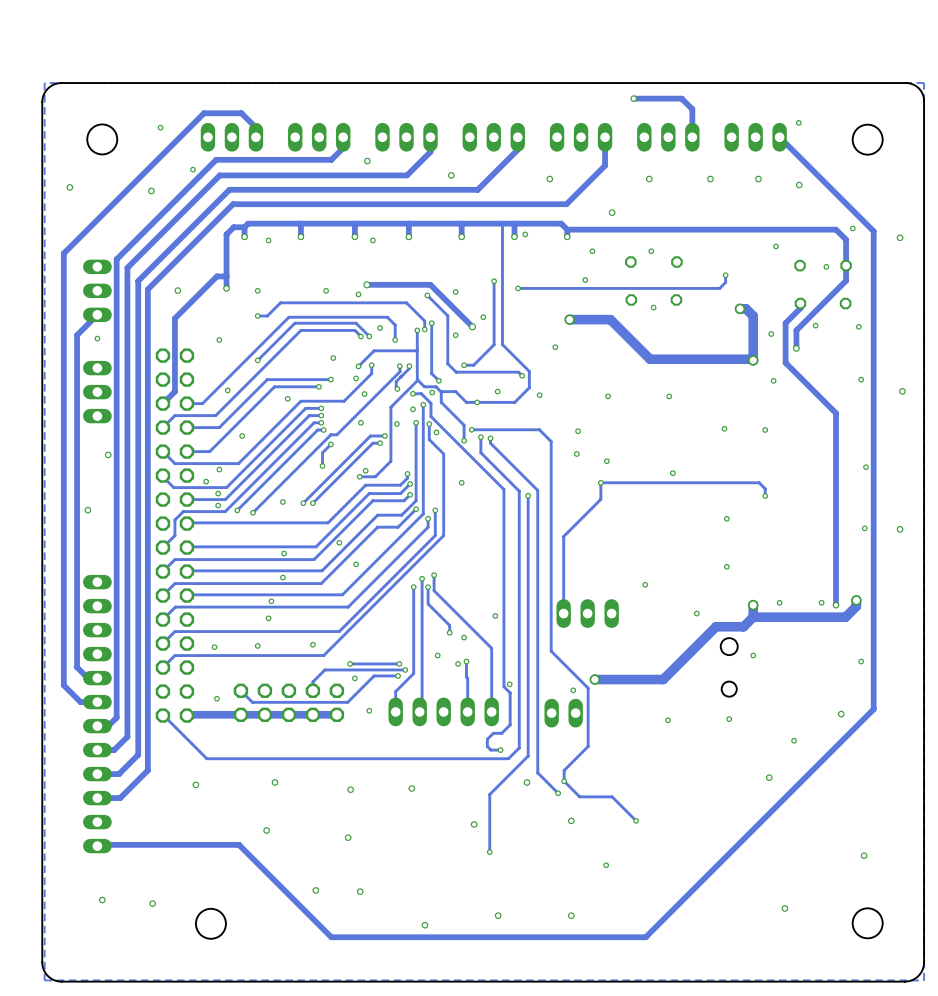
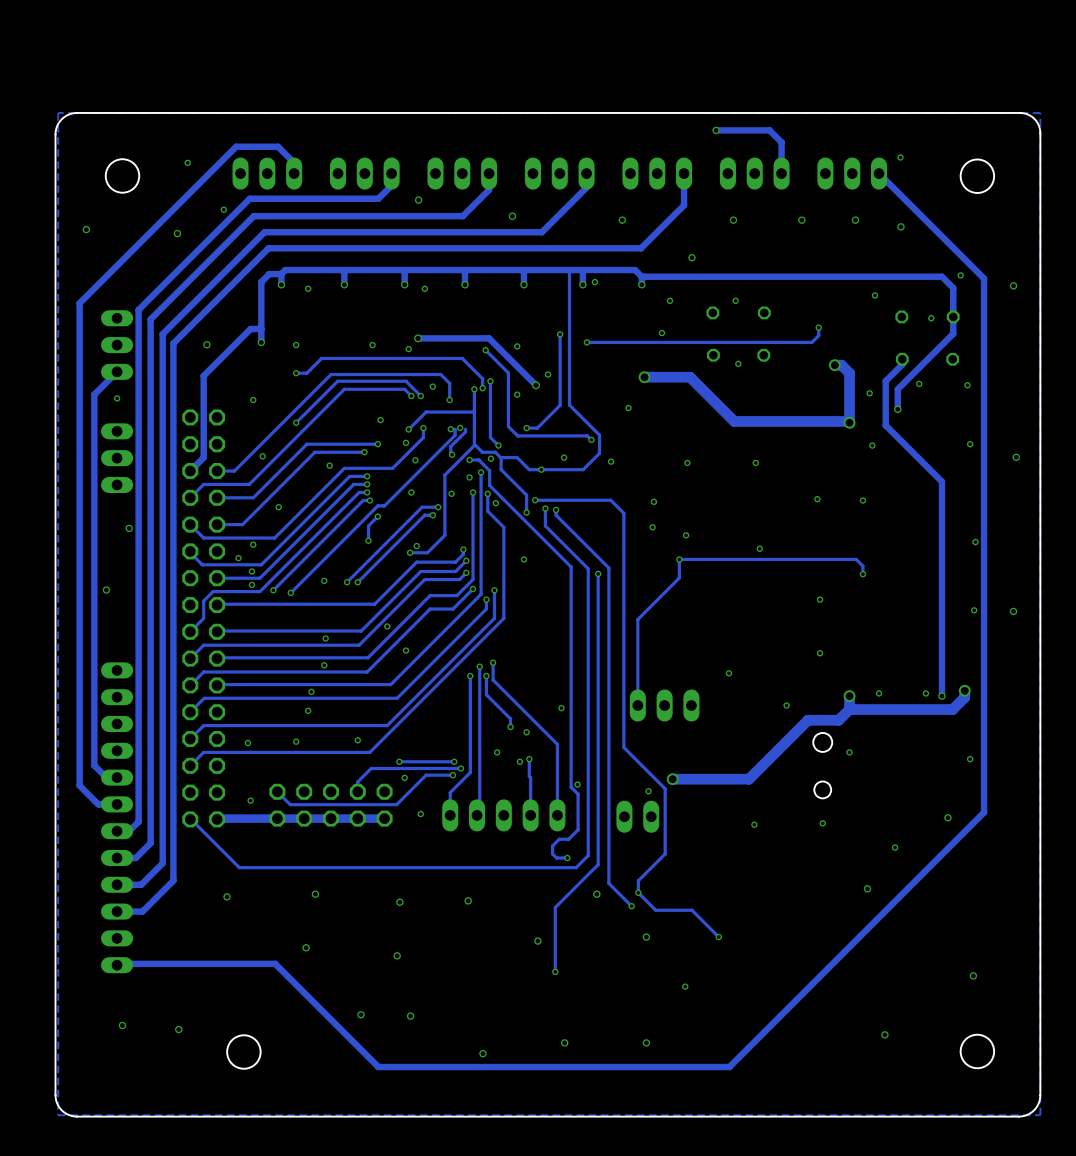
via: none -> (460, 427)
via: none -> (450, 429)
via: (399, 366) -> none
via: (409, 366) -> none

